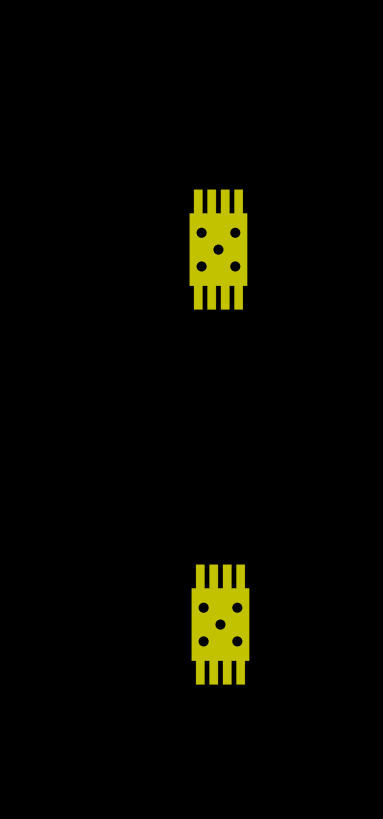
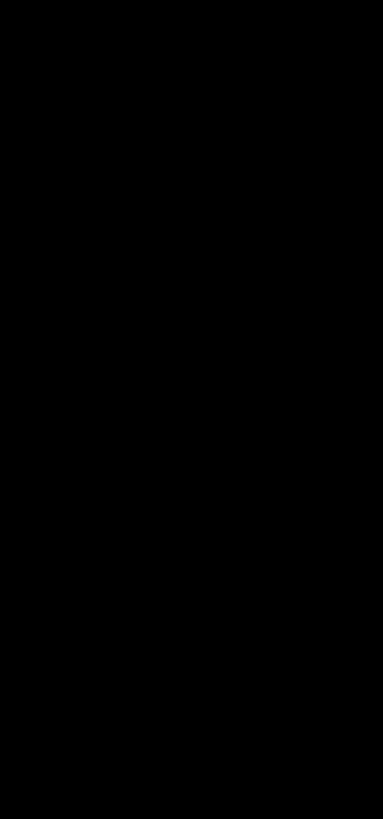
part: (218, 249) -> none
part: (220, 624) -> none

